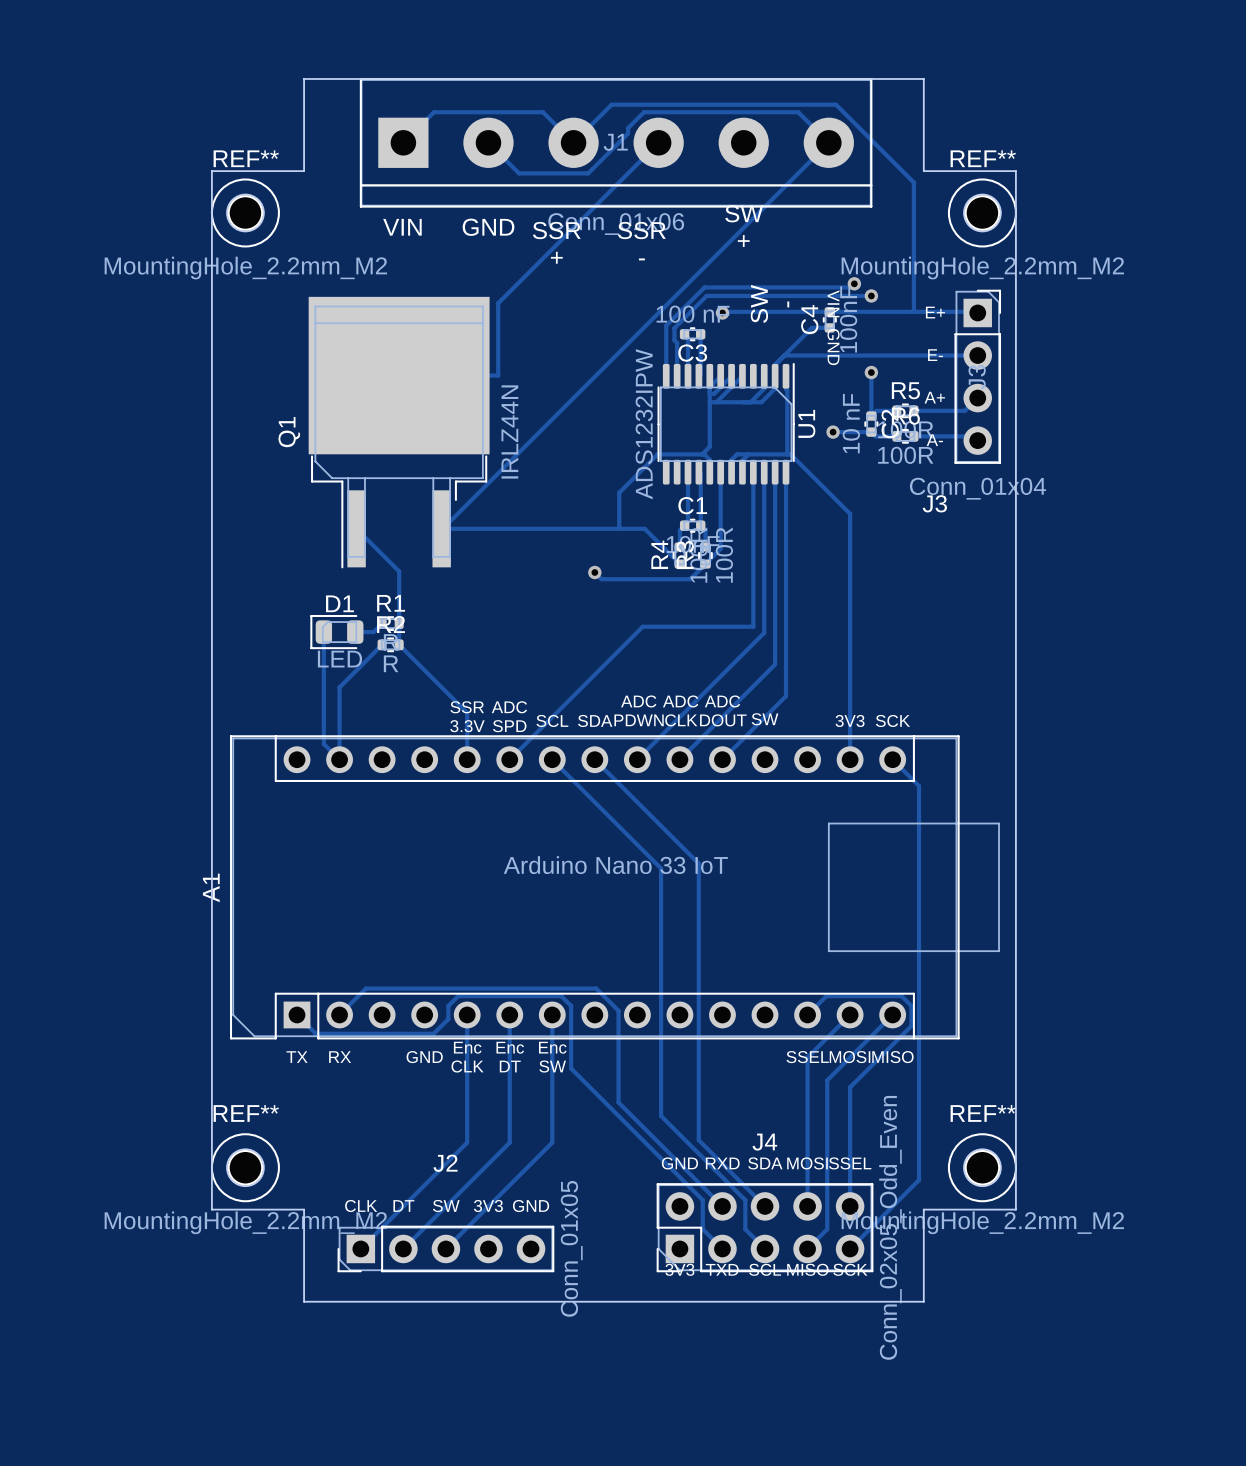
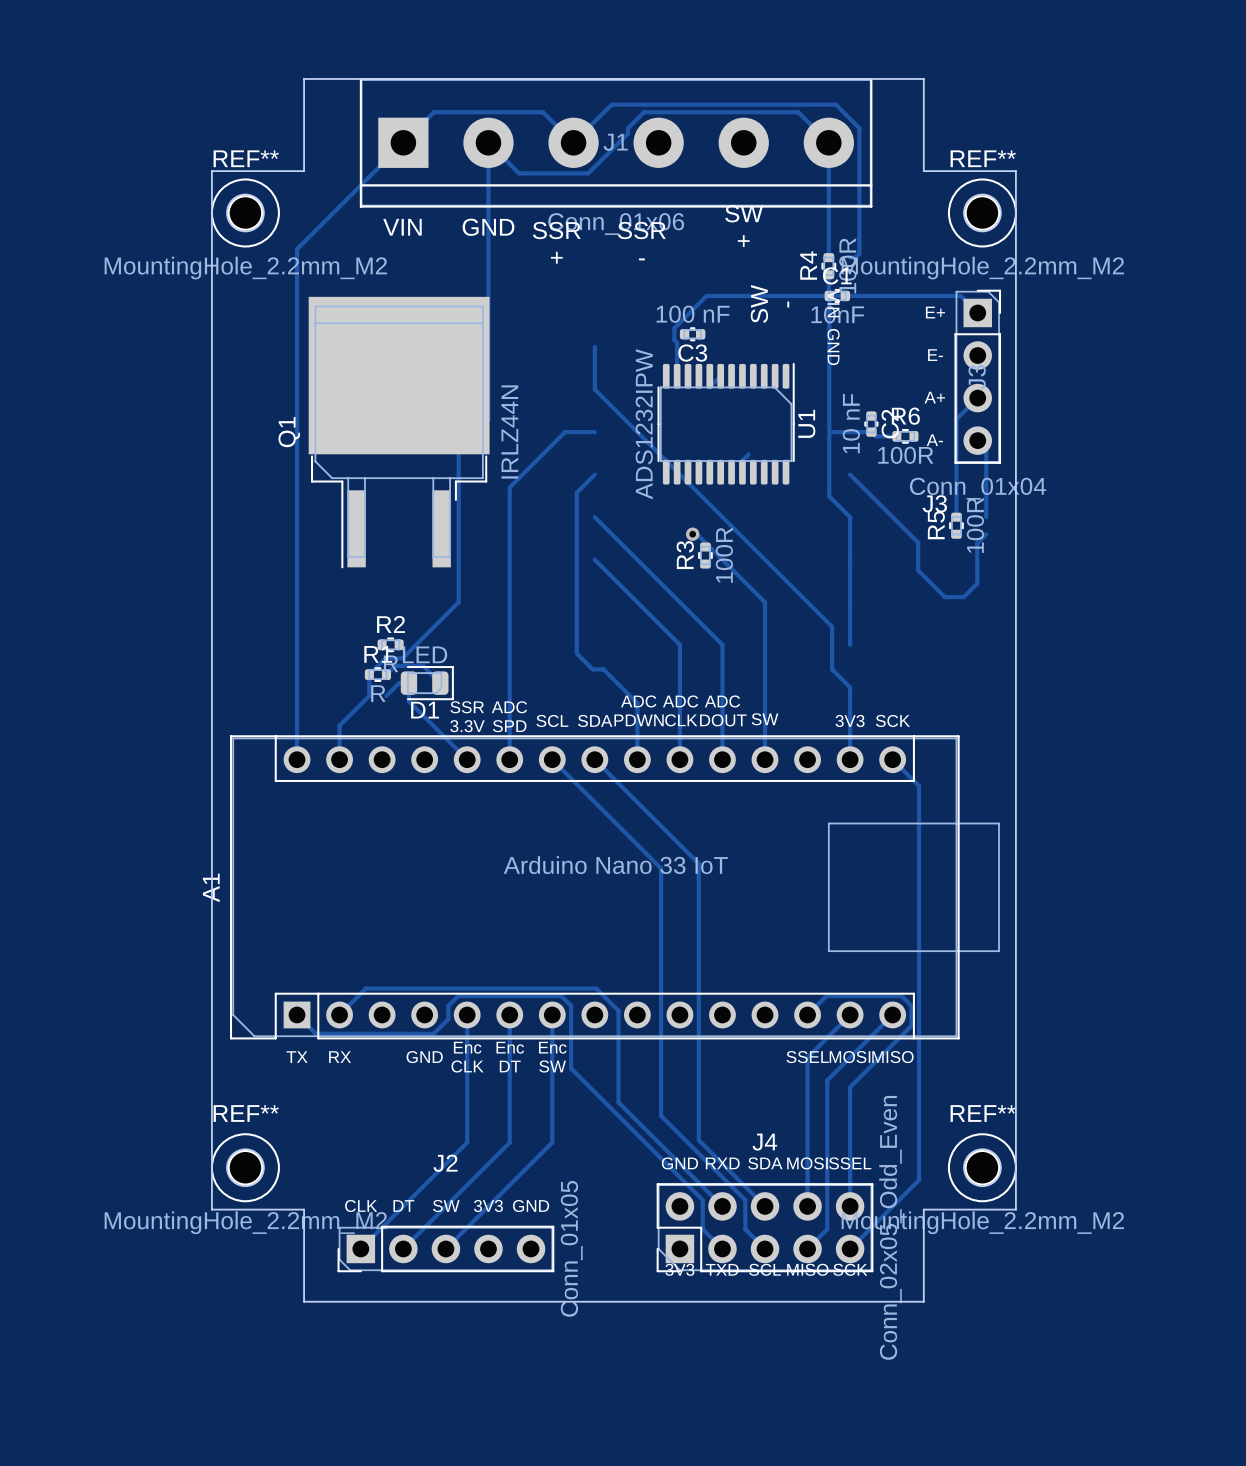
track: (859, 128) (913, 182) (912, 311) -> (859, 128) (859, 253) (855, 257) (850, 257)
track: none -> (403, 142) (297, 249) (297, 759)
track: (658, 142) (498, 303) (498, 375) (399, 375) -> none
track: (828, 142) (442, 528) -> (828, 142) (828, 257)
track: (854, 283) (850, 287) (704, 287) (666, 325) (666, 376) -> none
via: (854, 283) -> none
via: (871, 295) -> none
track: (976, 311) (722, 312) -> (976, 311) (960, 295) (871, 295)
via: (722, 312) -> none
C4: 100nF (829, 319) -> none
track: (829, 327) (811, 327) (775, 364) (775, 388) (761, 402) (709, 402) -> none
track: (684, 334) (688, 337) (688, 376) -> none
track: (700, 334) (700, 374) (698, 376) -> none
track: (784, 355) (977, 355) -> none
track: (871, 372) (871, 416) (876, 410) (896, 410) -> none
via: (871, 372) -> none
track: (709, 376) (709, 446) (702, 454) -> none
track: (731, 376) (713, 393) (709, 393) -> none
track: (742, 376) (716, 402) -> none
track: (764, 376) (764, 388) (750, 402) -> none
track: (786, 376) (787, 454) -> none
R5 rotation: 0° (905, 410) -> 90° clockwise (956, 525)
R5 position: (905, 410) -> (956, 525)
track: (913, 410) (964, 410) -> (956, 517) (956, 419) (964, 410)
via: (833, 432) -> none
track: (913, 436) (973, 436) (977, 440) -> (986, 517) (986, 449) (977, 440)
track: (688, 472) (688, 522) (679, 530) (679, 546) -> none
track: (698, 472) (700, 474) (700, 525) (705, 530) (705, 546) -> none
track: (709, 472) (709, 459) (704, 454) (657, 454) (619, 492) (619, 528) -> none
track: (720, 472) (720, 548) (690, 579) (601, 579) (594, 572) -> none
track: (731, 472) (731, 459) (737, 454) (790, 454) (850, 513) (850, 517) -> (828, 274) (829, 496) (850, 517)
track: (753, 472) (753, 626) (642, 626) (509, 759) -> (594, 432) (565, 432) (509, 487) (509, 759)
track: (764, 472) (764, 632) (637, 759) -> (594, 474) (576, 492) (576, 653) (592, 669) (603, 669) (637, 703) (637, 759)
track: (775, 472) (775, 664) (679, 759) -> (594, 559) (679, 644) (679, 759)
track: (786, 472) (786, 696) (722, 759) -> (594, 517) (722, 644) (722, 759)
track: none -> (850, 474) (918, 542) (918, 570) (944, 597) (963, 597) (977, 583) (977, 543) (986, 534)
C1 position: (692, 525) -> (837, 295)
track: (356, 528) (399, 571) (399, 644) (467, 712) (467, 759) -> (386, 695) (399, 683) (408, 683) (408, 701) (467, 759)
track: (441, 528) (644, 528) (679, 564) -> none
track: none -> (692, 534) (696, 534) (765, 602) (765, 759)
via: none -> (692, 534)
R4 position: (679, 555) -> (828, 266)
via: (594, 572) -> none
track: (382, 623) (373, 632) (355, 632) -> none
R1 position: (390, 623) -> (377, 674)
track: (323, 632) (323, 744) (339, 759) -> none
D1 rotation: 0° (336, 632) -> 180° (427, 683)
D1 position: (336, 632) -> (427, 683)
track: (382, 644) (339, 687) (339, 725) -> (488, 142) (488, 419) (458, 449) (458, 602) (402, 658) (385, 658) (369, 674) (369, 695) (339, 725)
track: (850, 644) (850, 687) -> (594, 347) (594, 389) (832, 626) (832, 669) (850, 687)
track: none -> (386, 674) (395, 665) (423, 665) (440, 683)

